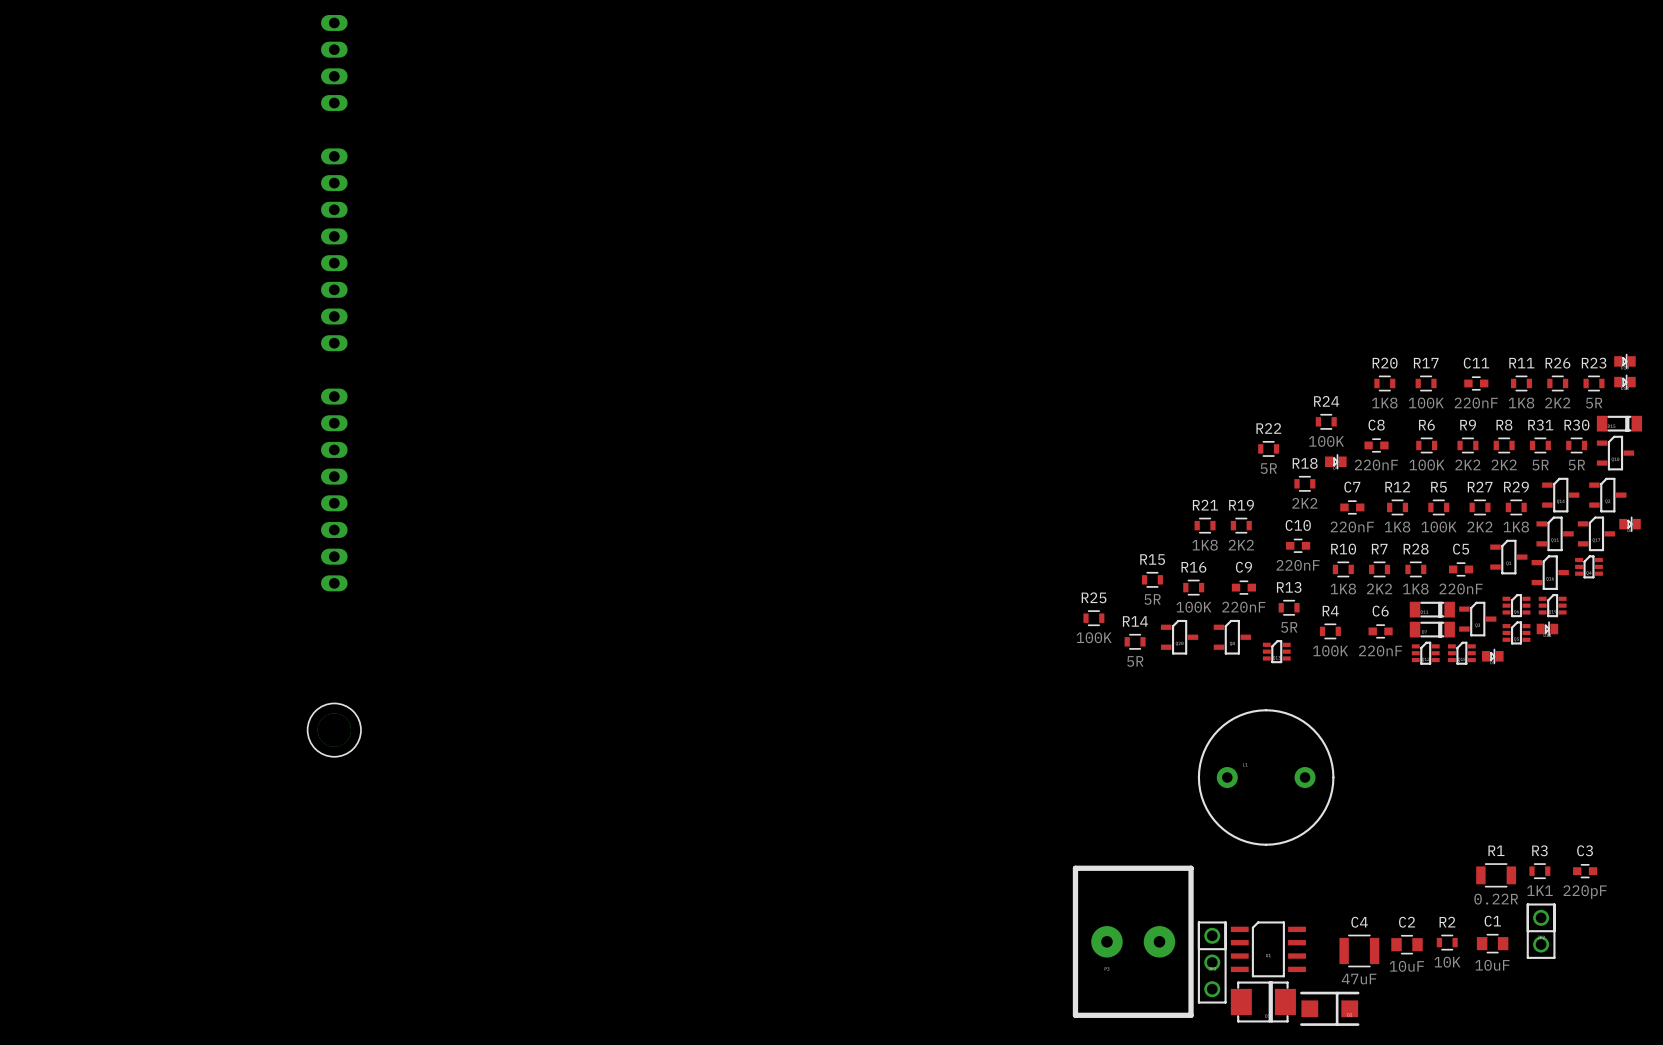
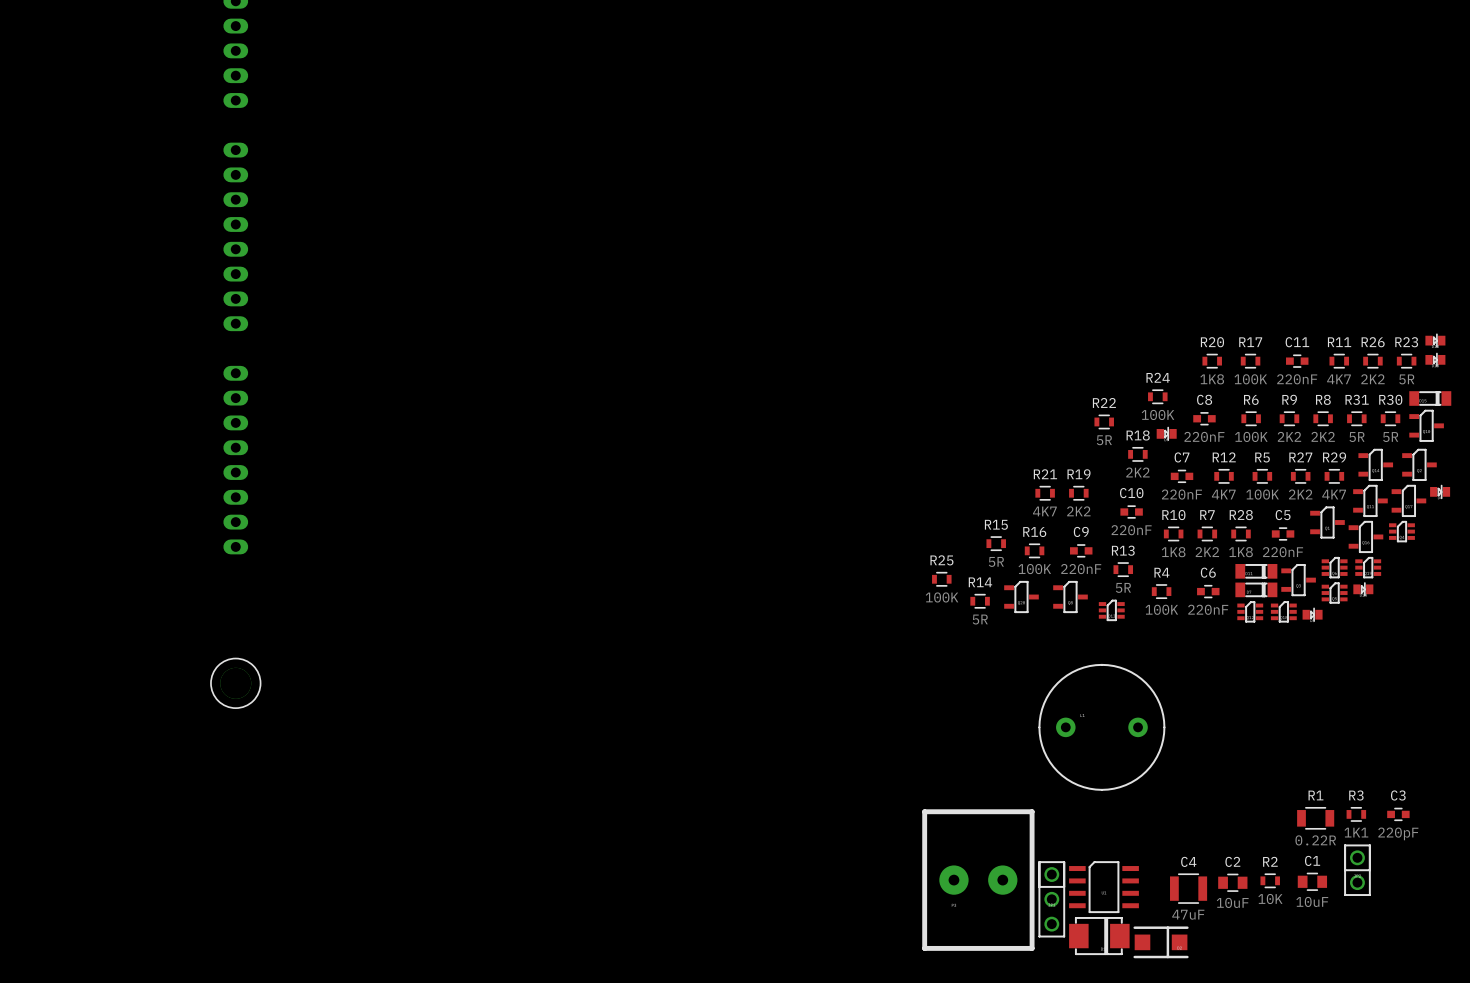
R11 value: 1K8 (1521, 403) -> 4K7 (1339, 379)
R12 value: 1K8 (1397, 527) -> 4K7 (1223, 494)
R29 value: 1K8 (1516, 527) -> 4K7 (1334, 494)
R21 value: 1K8 (1205, 545) -> 4K7 (1044, 511)

